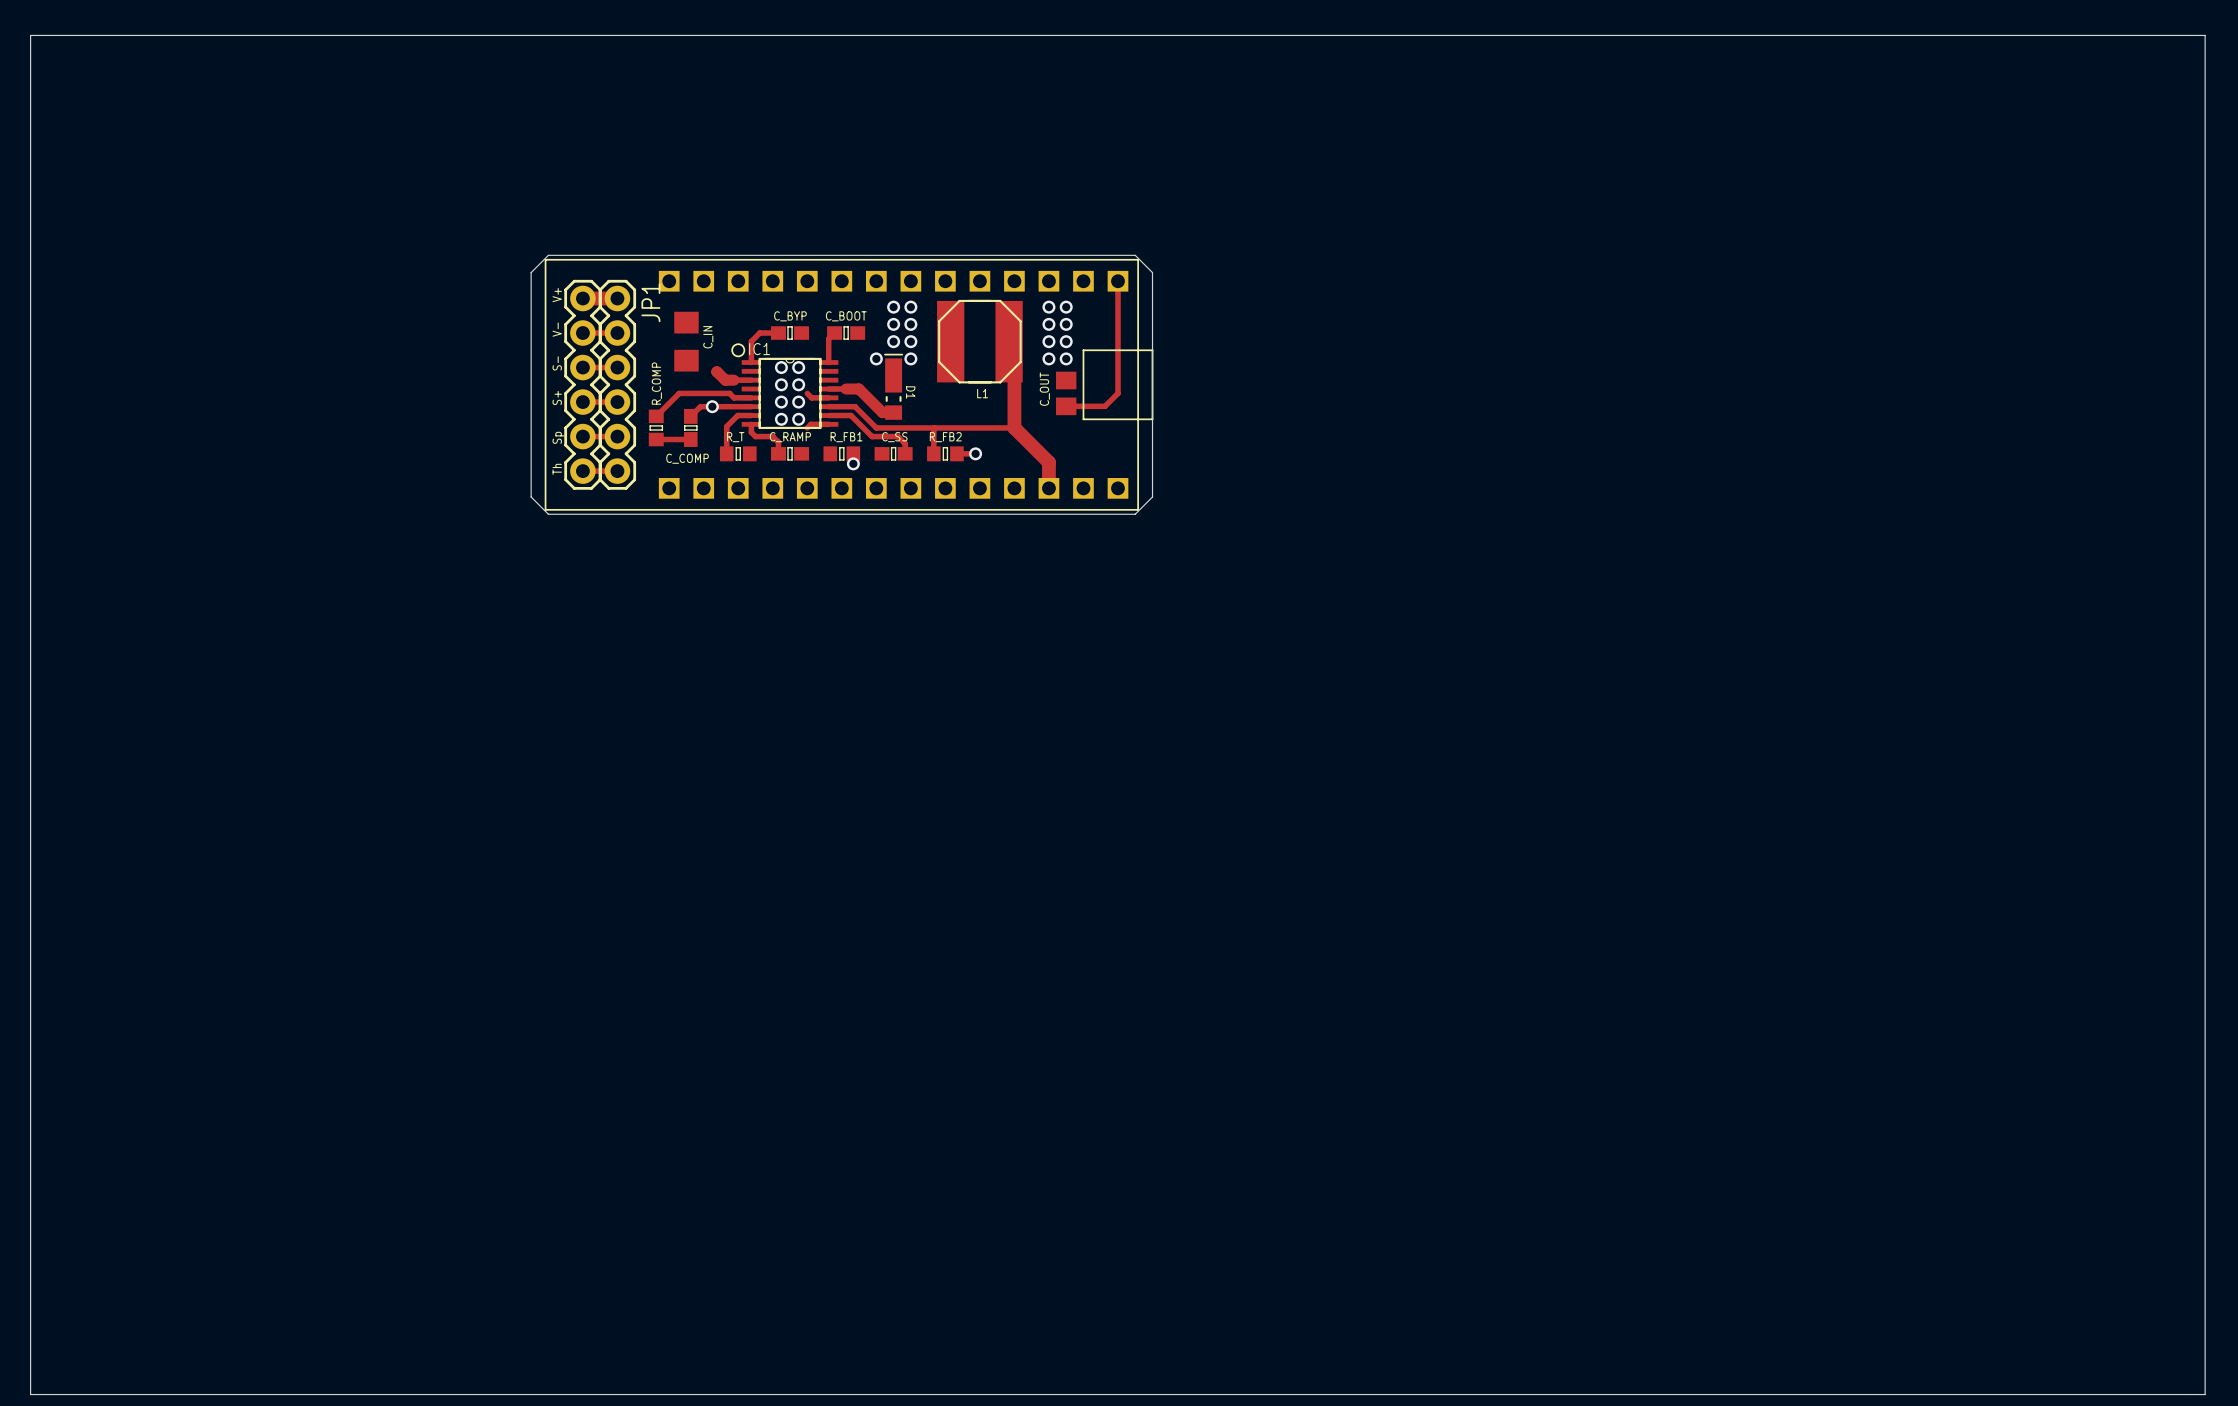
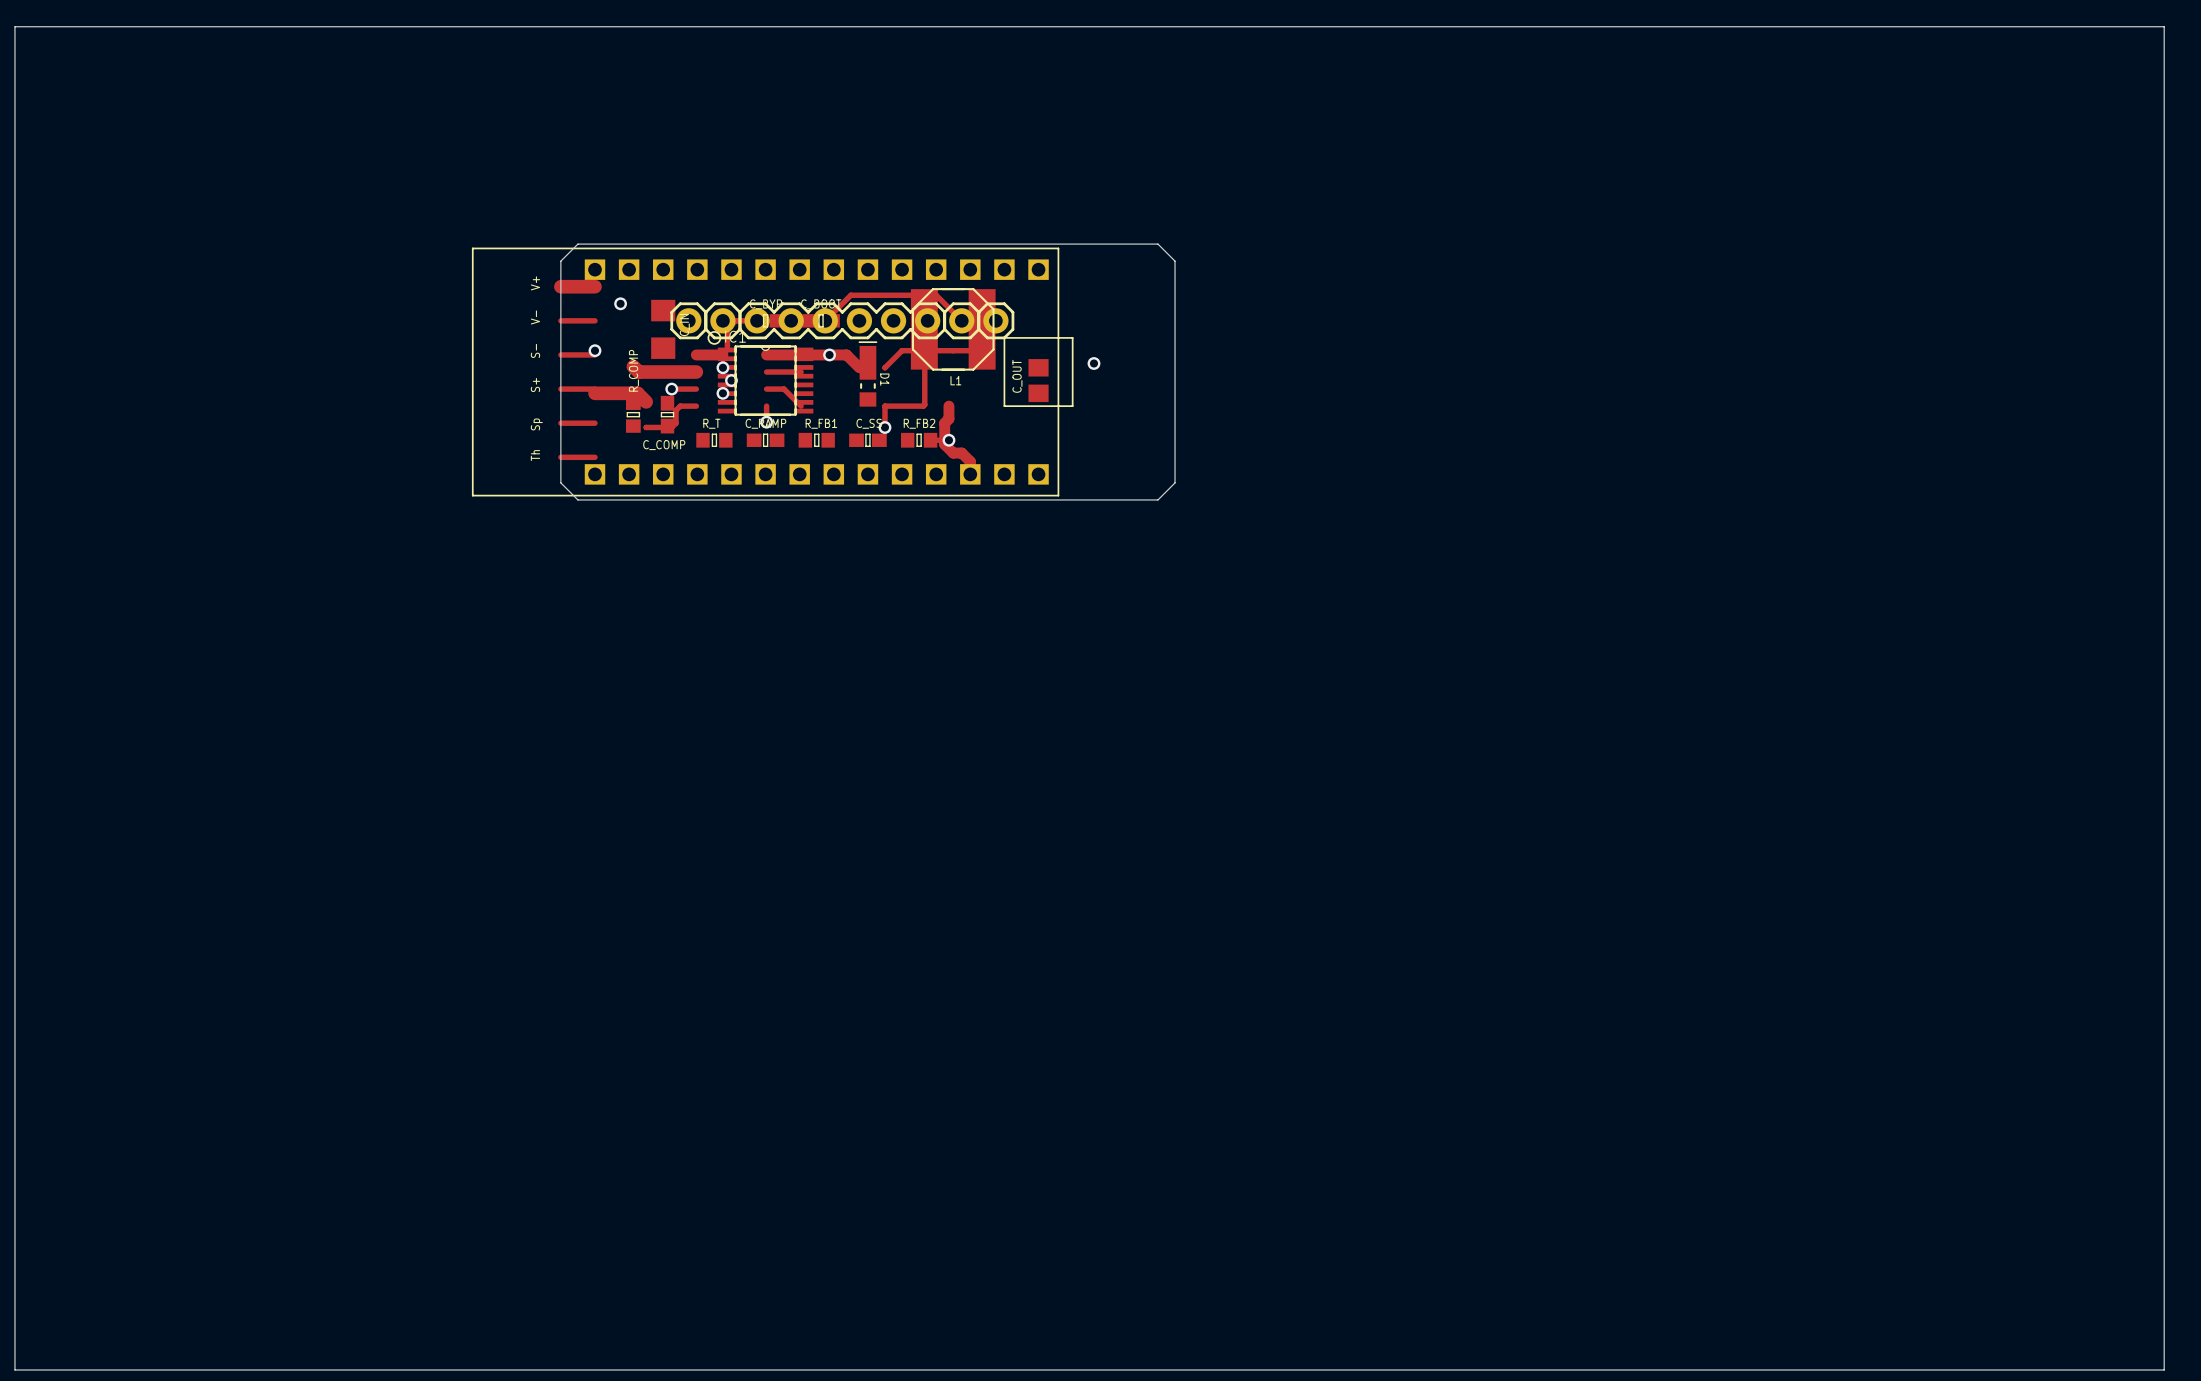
board edge: (600, 255) (548, 255) (531, 272) (531, 496) (548, 514) (600, 514) -> (577, 244) (560, 261) (560, 482) (577, 499)
board edge: (1135, 255) (1152, 272) (1152, 496) (1135, 514) -> (1106, 244) (1157, 244) (1175, 261) (1175, 482) (1157, 499) (1106, 499)
track: (1117, 281) (1117, 393) (1105, 406) (1066, 406) -> none
via: (893, 307) -> none
via: (910, 307) -> none
via: (1048, 307) -> none
via: (1066, 307) -> none
via: none -> (620, 303)
via: (893, 324) -> none
via: (910, 324) -> none
via: (1048, 324) -> none
via: (1066, 324) -> none
part: none -> (688, 320)
part: none -> (722, 320)
track: (834, 333) (828, 338) (828, 362) -> none
track: none -> (825, 320) (850, 295) (936, 295) (961, 320)
part: none -> (961, 320)
part: none -> (995, 320)
via: (893, 341) -> none
via: (910, 341) -> none
via: (1048, 341) -> none
via: (1066, 341) -> none
via: (876, 358) -> none
via: (910, 358) -> none
via: (1048, 358) -> none
via: (1066, 358) -> none
via: none -> (594, 350)
track: none -> (696, 354) (722, 354) (722, 367)
via: (781, 367) -> none
track: none -> (766, 354) (846, 354) (859, 367)
via: (798, 367) -> none
via: none -> (829, 354)
track: none -> (978, 356) (973, 350) (902, 350) (885, 367)
track: (716, 371) (725, 380) (751, 380) -> none
track: (1014, 376) (1014, 427) -> none
via: none -> (1093, 363)
track: none -> (633, 366) (638, 372) (696, 372)
via: none -> (722, 367)
track: none -> (924, 367) (924, 404) (884, 406) (884, 427)
part rotation: 0° (582, 384) -> 90° clockwise (842, 320)
part position: (582, 384) -> (842, 320)
JP1: (617, 384) -> none
via: (781, 384) -> none
track: none -> (766, 372) (801, 372)
via: (798, 384) -> none
part position: (849, 384) -> (772, 372)
track: (828, 389) (858, 389) (882, 412) (893, 412) -> none
via: none -> (731, 380)
track: (807, 393) (811, 397) (828, 397) -> none
track: (751, 397) (734, 397) (729, 393) (679, 393) (656, 416) -> none
track: none -> (671, 389) (696, 389)
via: none -> (671, 389)
via: (781, 402) -> none
track: none -> (766, 389) (784, 389) (801, 406)
via: (798, 402) -> none
track: none -> (594, 393) (637, 393) (646, 401)
via: (712, 406) -> none
via: none -> (722, 393)
track: (751, 406) (700, 406) (690, 416) -> none
track: (828, 406) (855, 406) (876, 427) (1014, 427) -> none
track: (751, 415) (737, 415) (726, 426) (726, 453) -> none
track: (828, 415) (850, 415) (872, 436) (897, 436) (905, 443) (905, 453) -> none
track: none -> (696, 406) (680, 406) (676, 410) (676, 423) (671, 427) (646, 427)
via: (781, 419) -> none
track: none -> (766, 406) (766, 422)
via: (798, 419) -> none
track: none -> (948, 406) (948, 418) (944, 423) (944, 444) (953, 453) (961, 453) (970, 461) (970, 474)
track: (751, 424) (751, 432) (755, 436) (772, 436) (778, 442) (778, 453) -> none
track: (828, 424) (810, 424) (807, 427) -> none
track: (933, 427) (933, 453) -> none
track: (1014, 427) (1048, 462) (1048, 488) -> none
via: none -> (766, 422)
track: (656, 439) (690, 439) -> none
via: none -> (884, 427)
via: (853, 463) -> none

